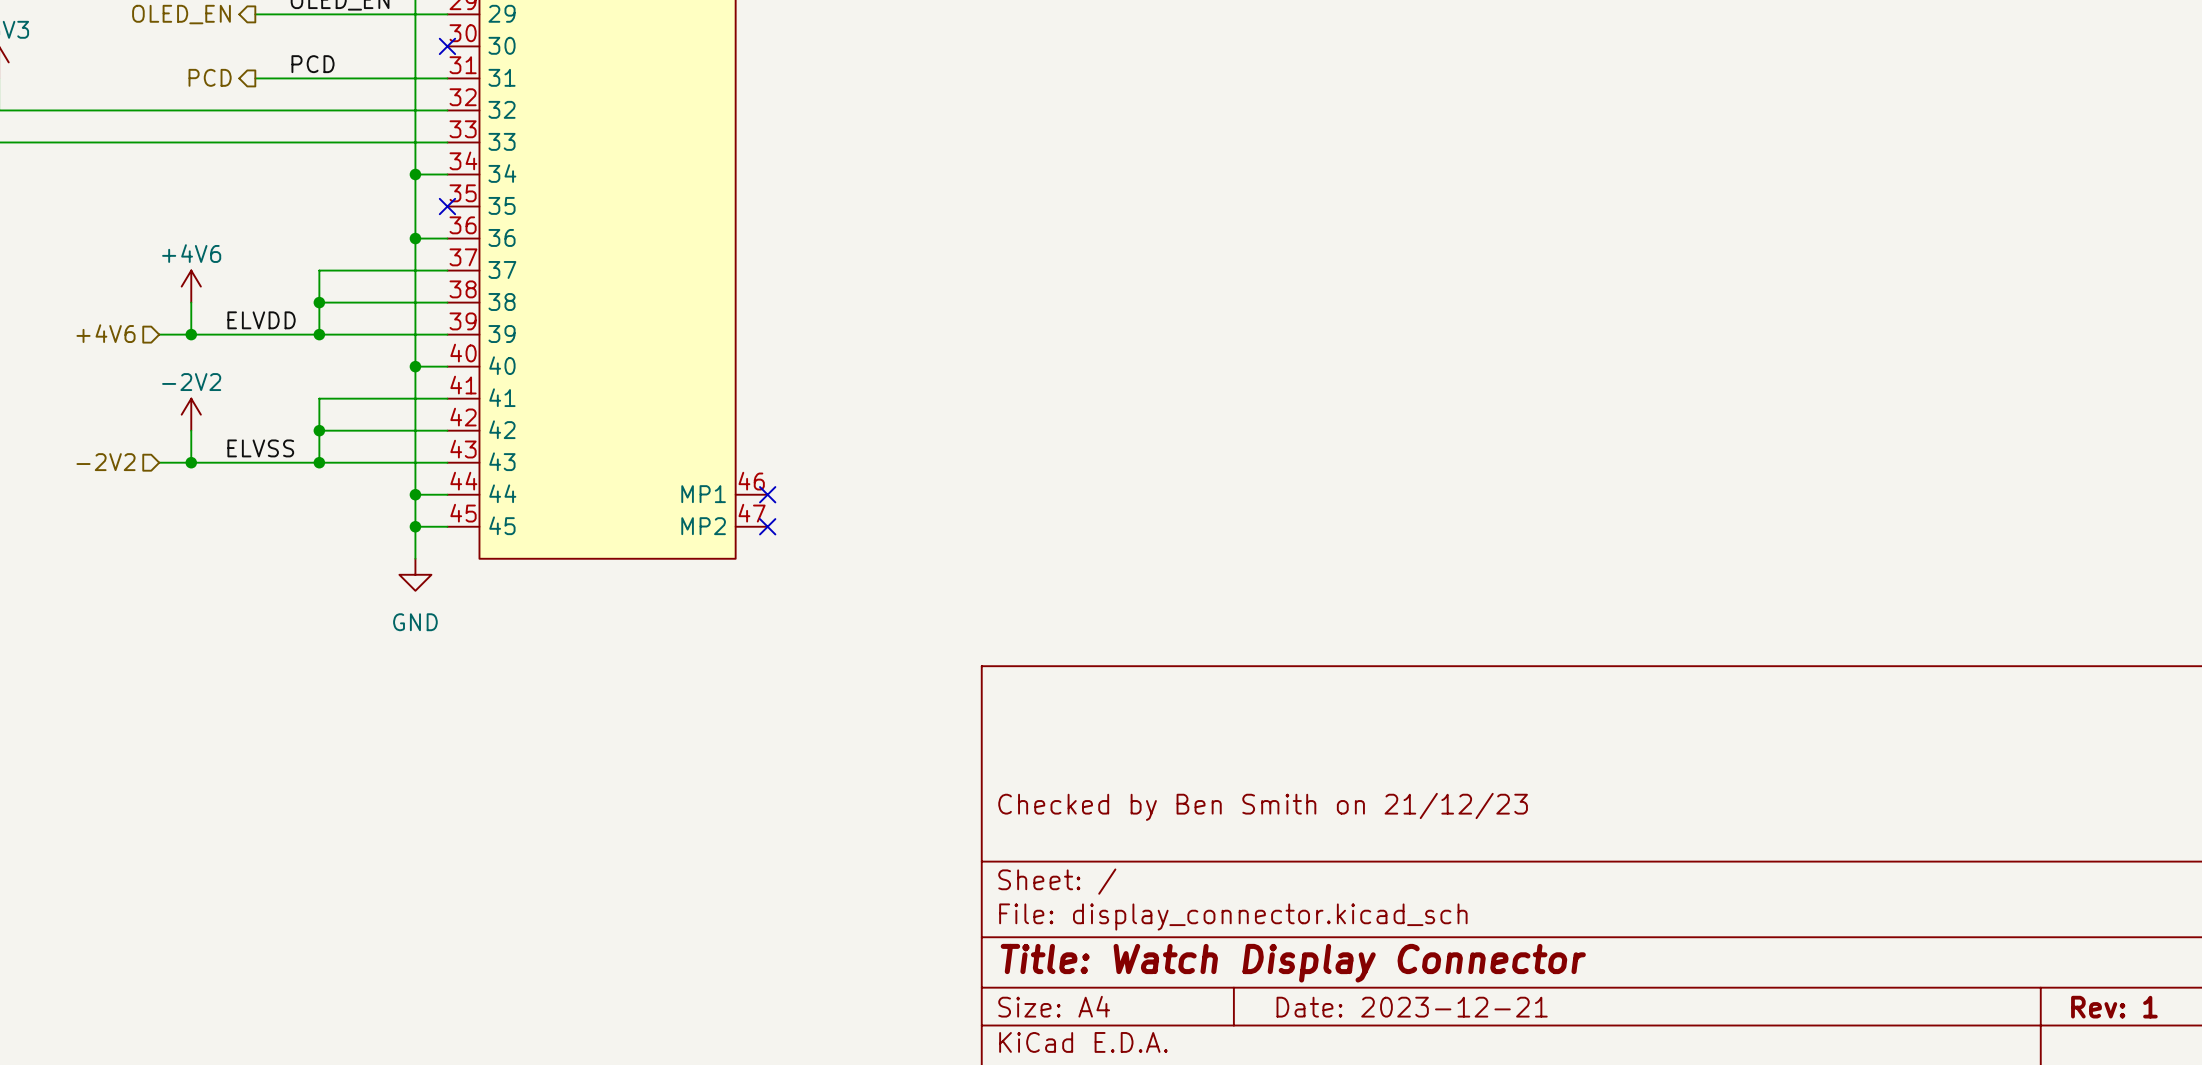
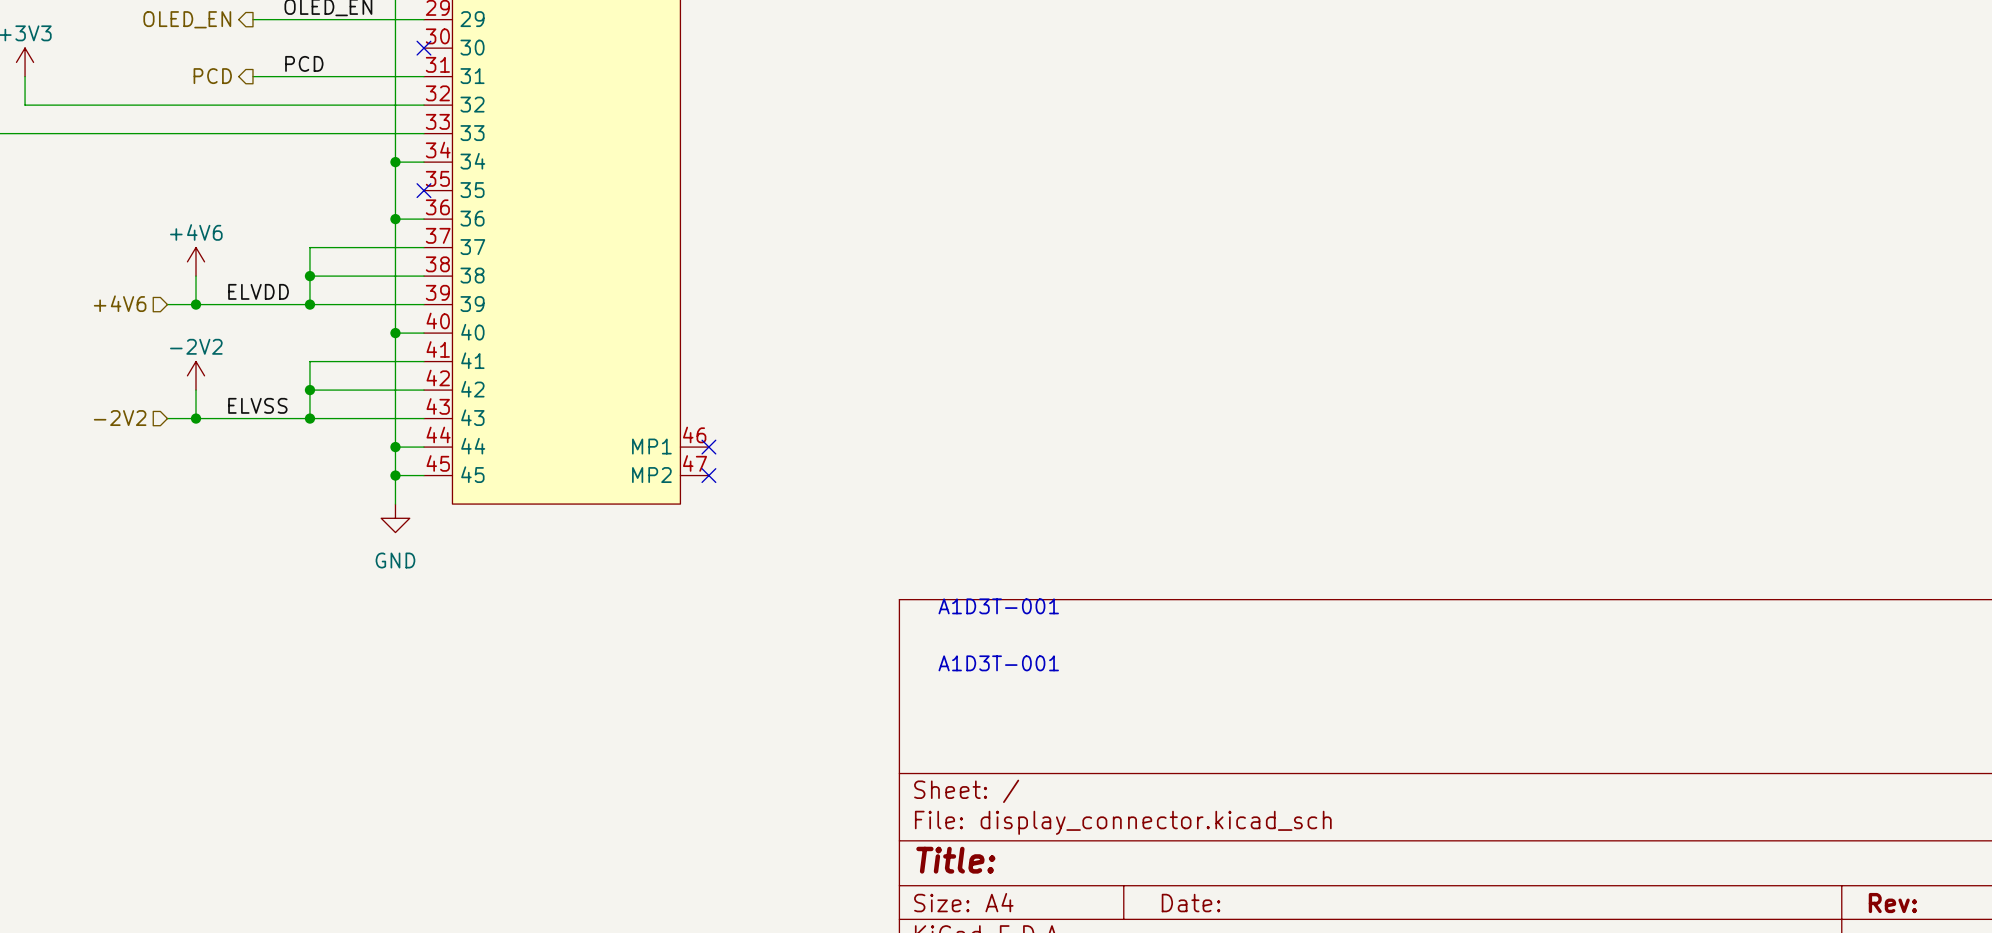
text: none -> A1D3T-001 (998, 606)
text: none -> A1D3T-001 (998, 663)
title block: Checked by Ben Smith on 21/12/23 (1263, 806) -> none
title block: Title: Watch Display Connector (1293, 963) -> Title: (955, 860)
title block: Date: 2023-12-21 (1412, 1007) -> Date: (1191, 903)
title block: Rev: 1 (2114, 1007) -> Rev: (1892, 903)

